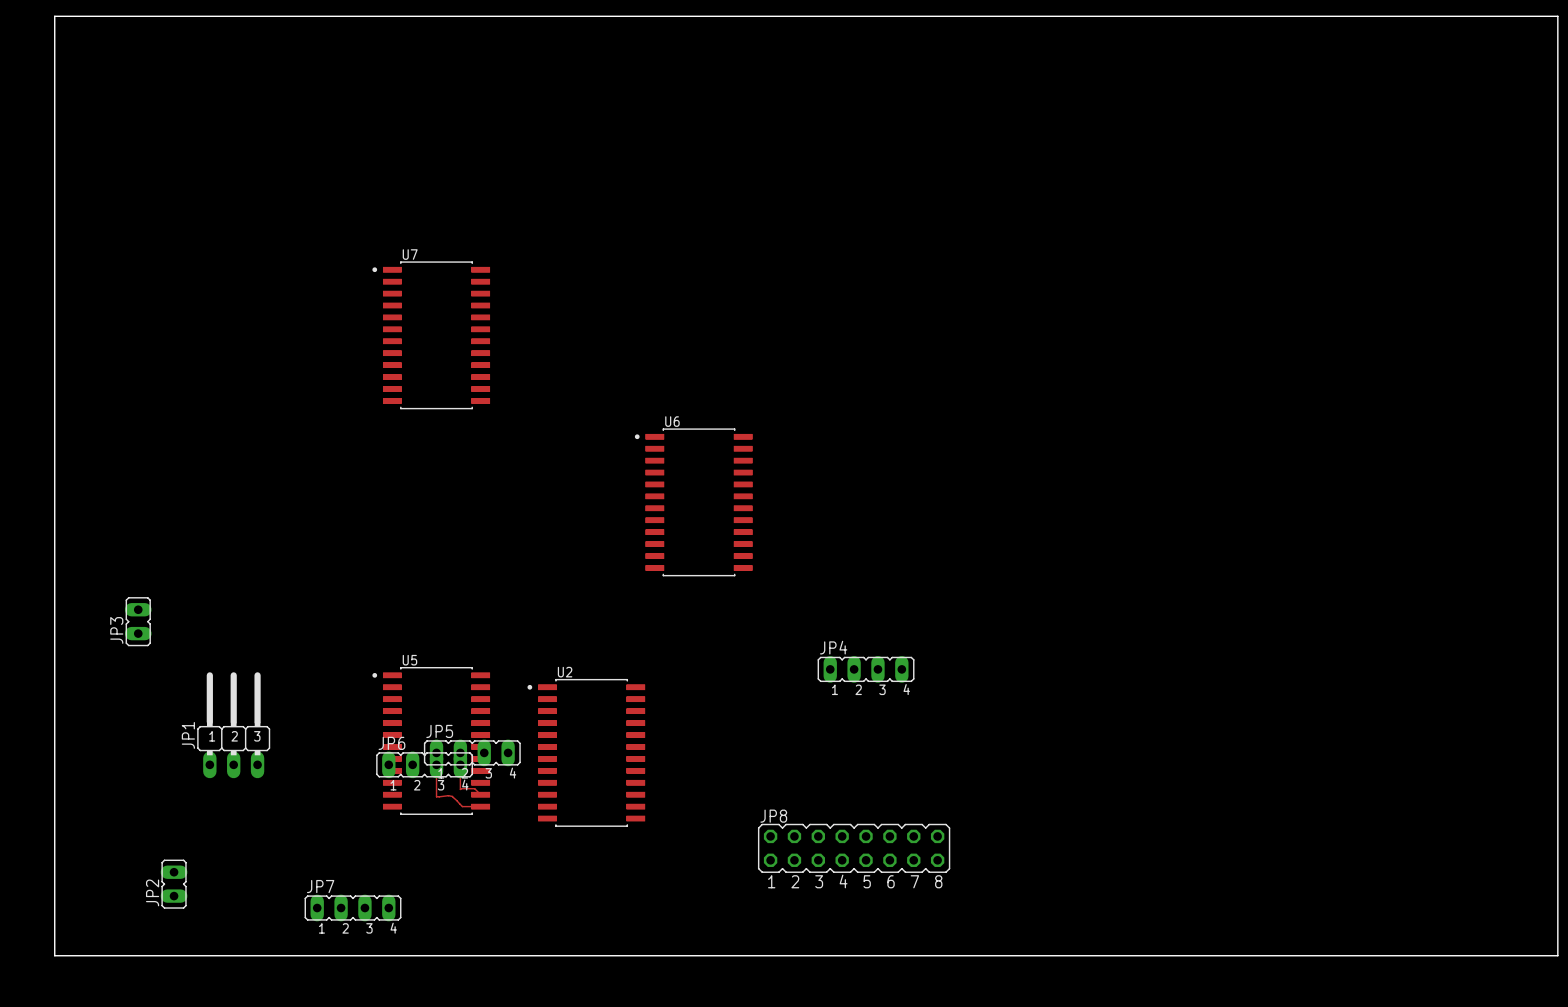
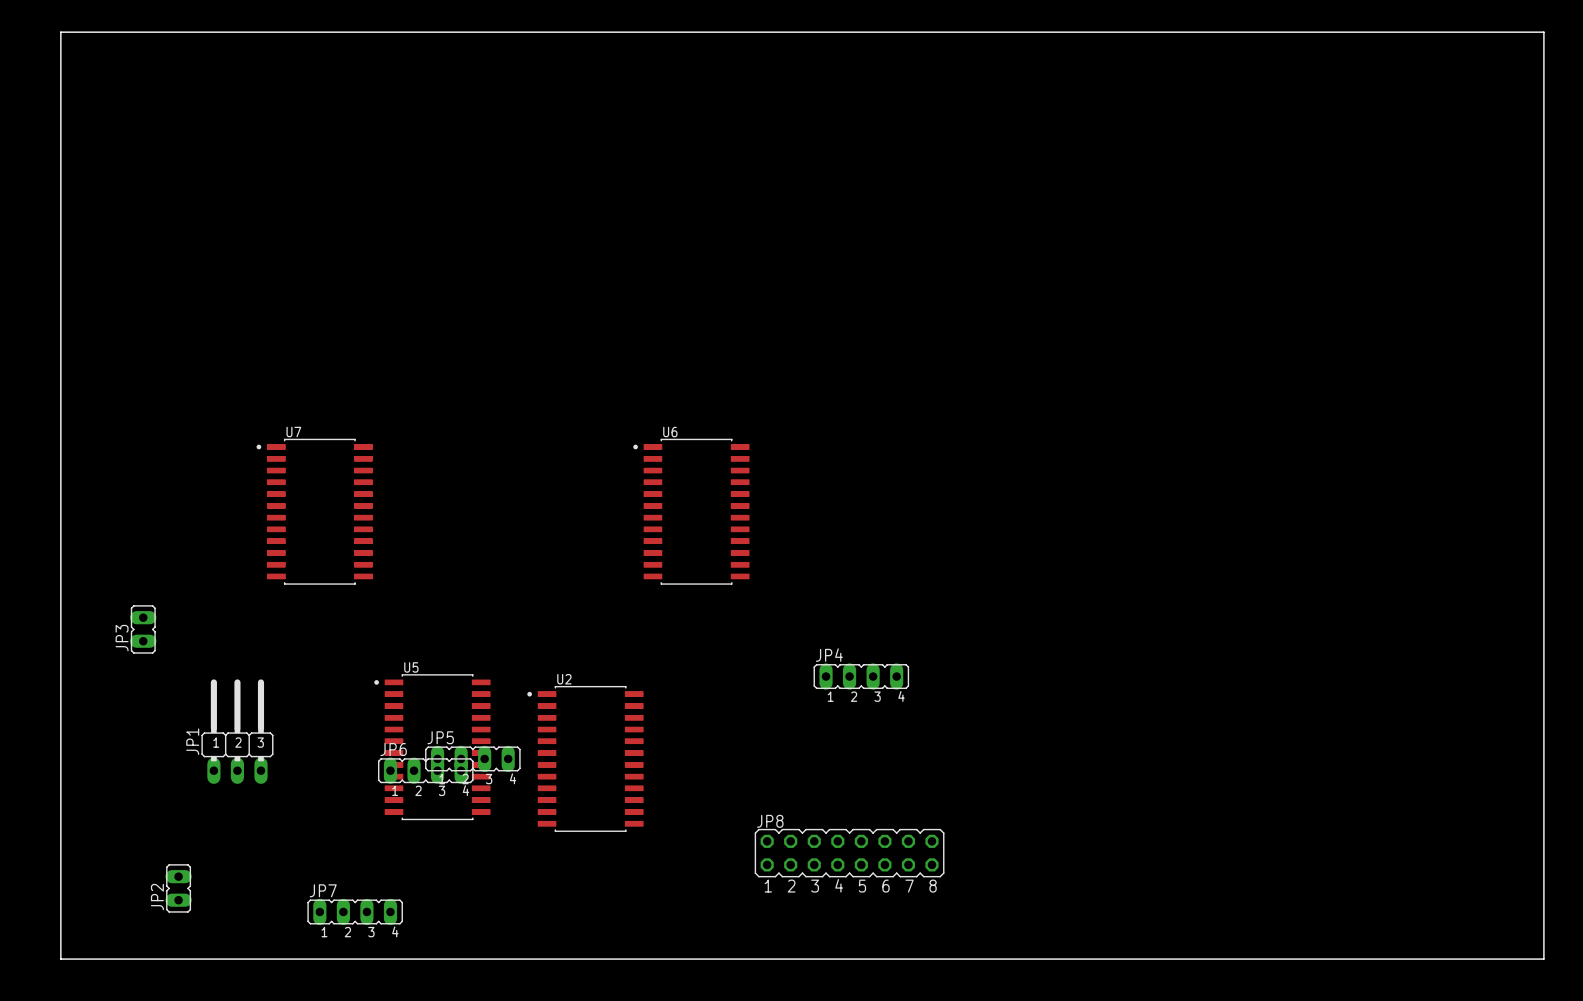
U7 position: (431, 335) -> (314, 511)
track: (436, 752) (436, 796) (452, 796) (462, 806) (480, 806) -> none
track: (460, 752) (460, 789) (474, 788) (480, 794) -> none

